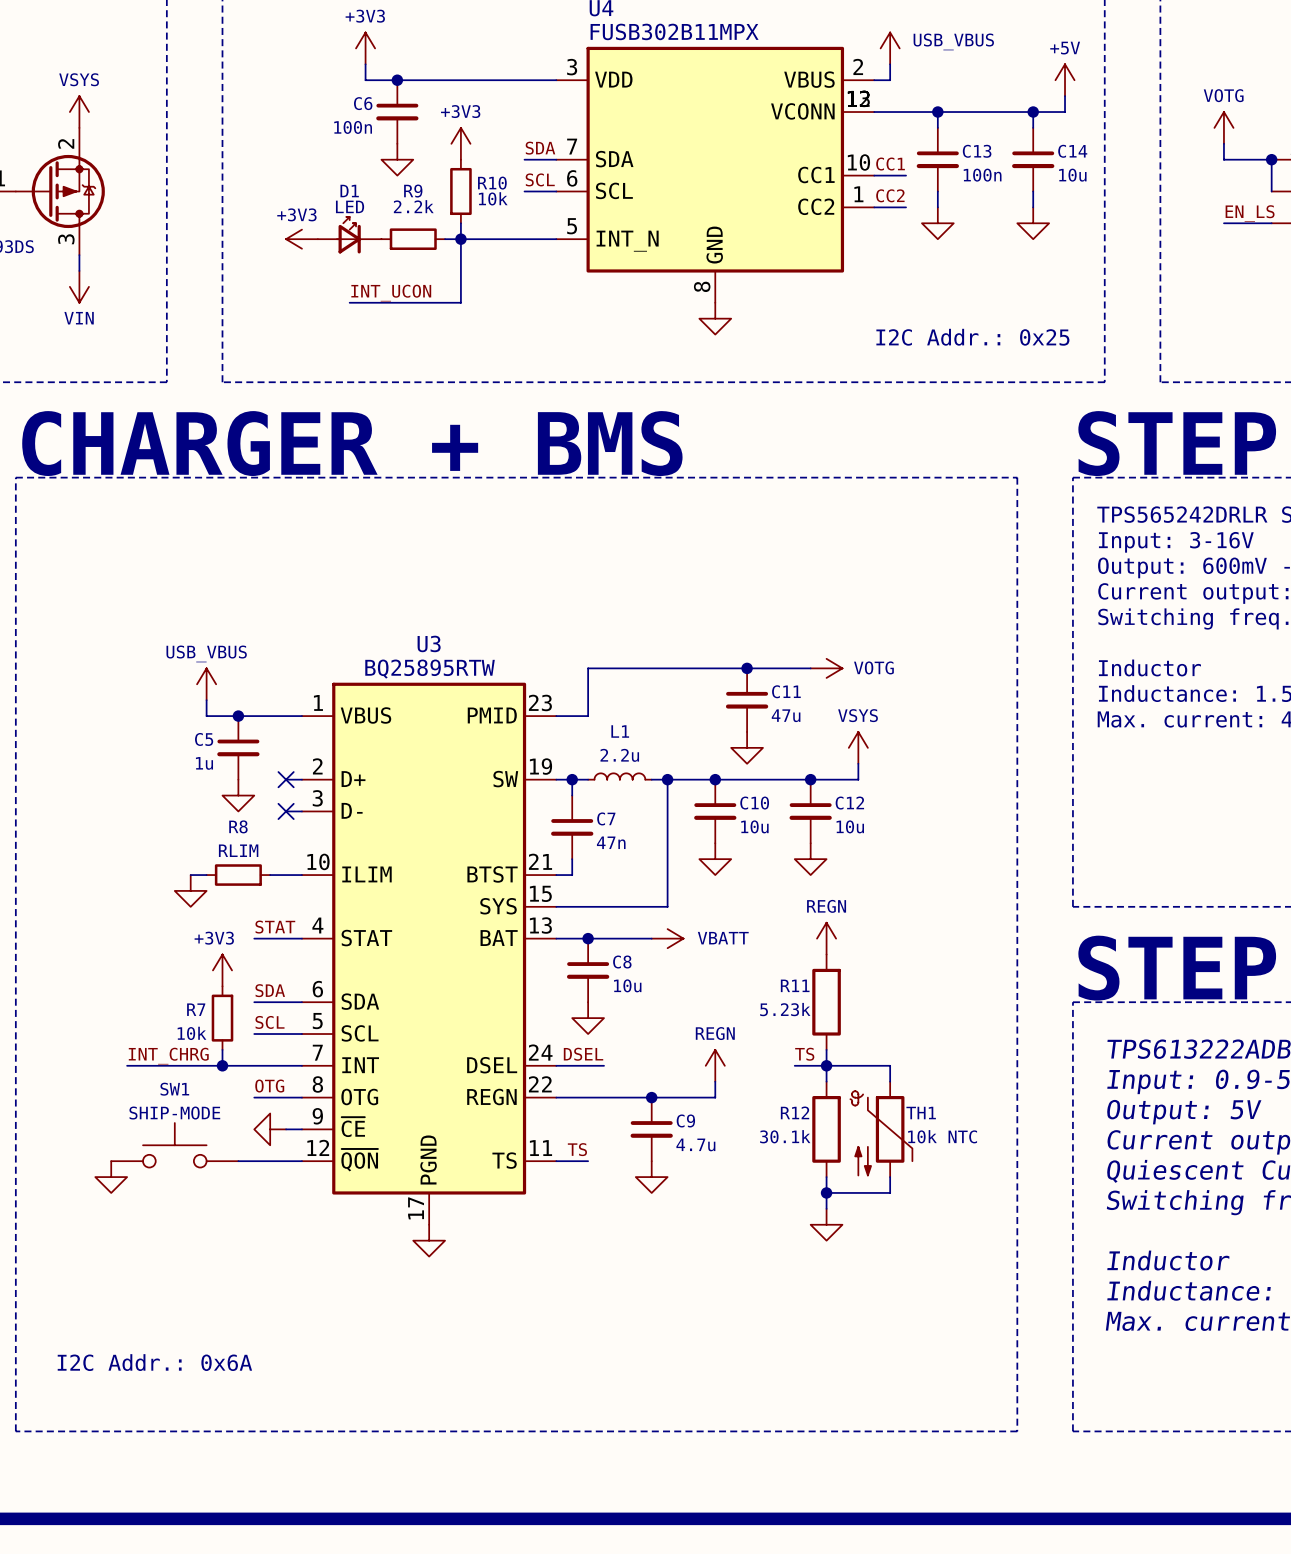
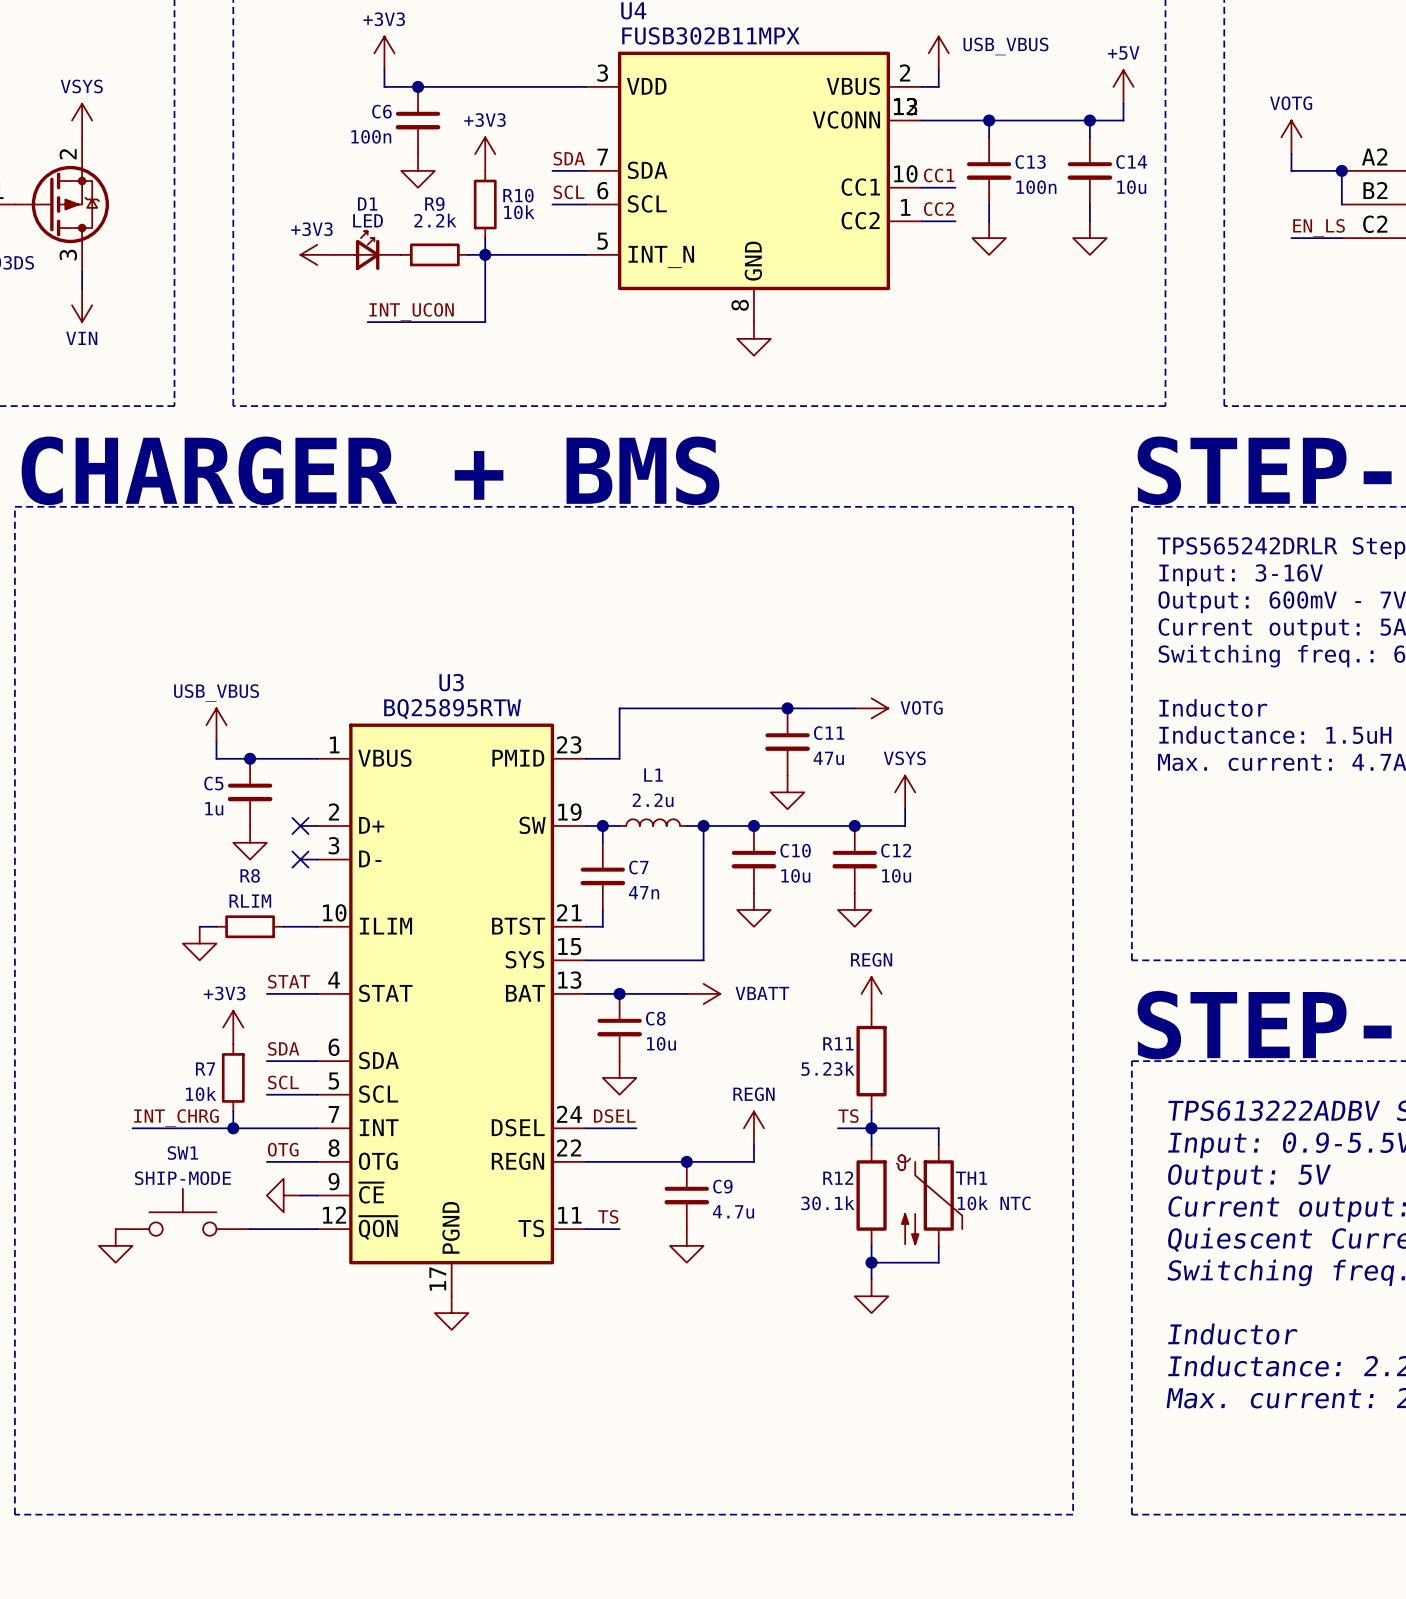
text: I2C Addr.: 0x25 (972, 337) -> none
text: I2C Addr.: 0x6A (154, 1362) -> none

